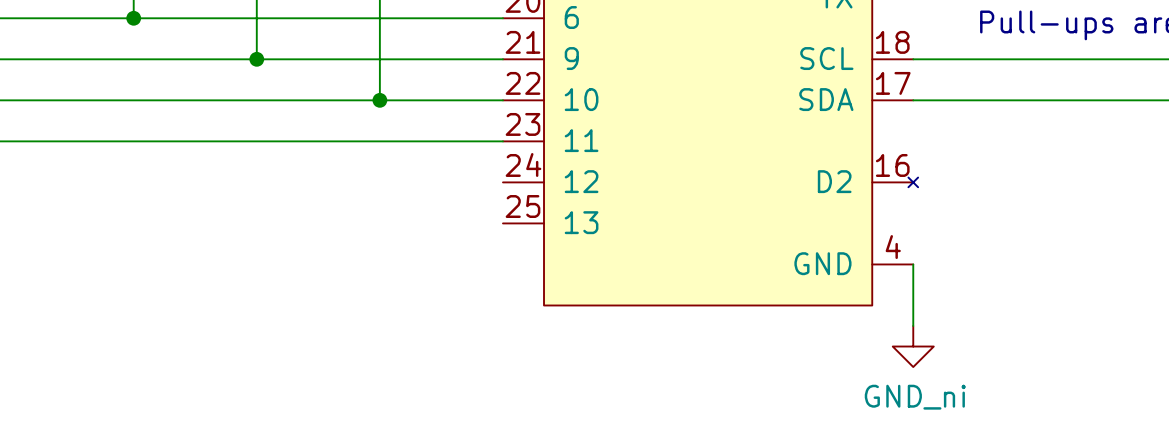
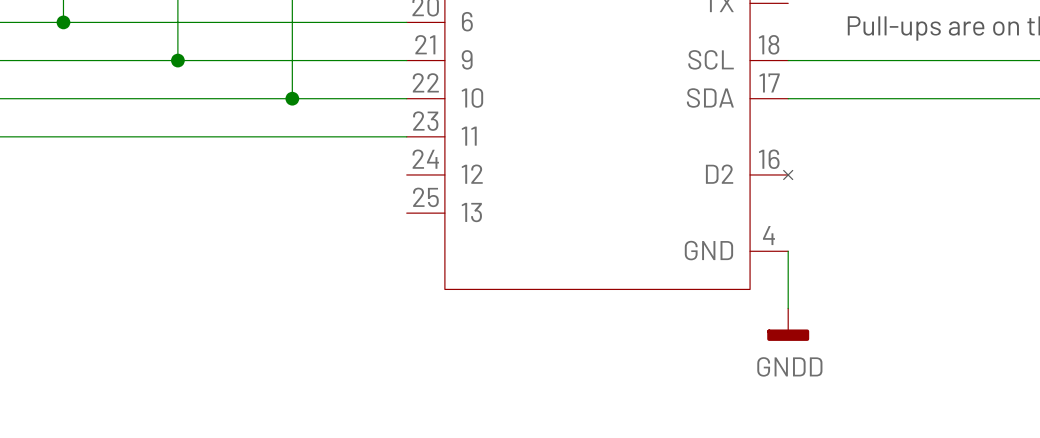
power symbol: GND_ni (913, 346) -> GNDD (788, 324)

